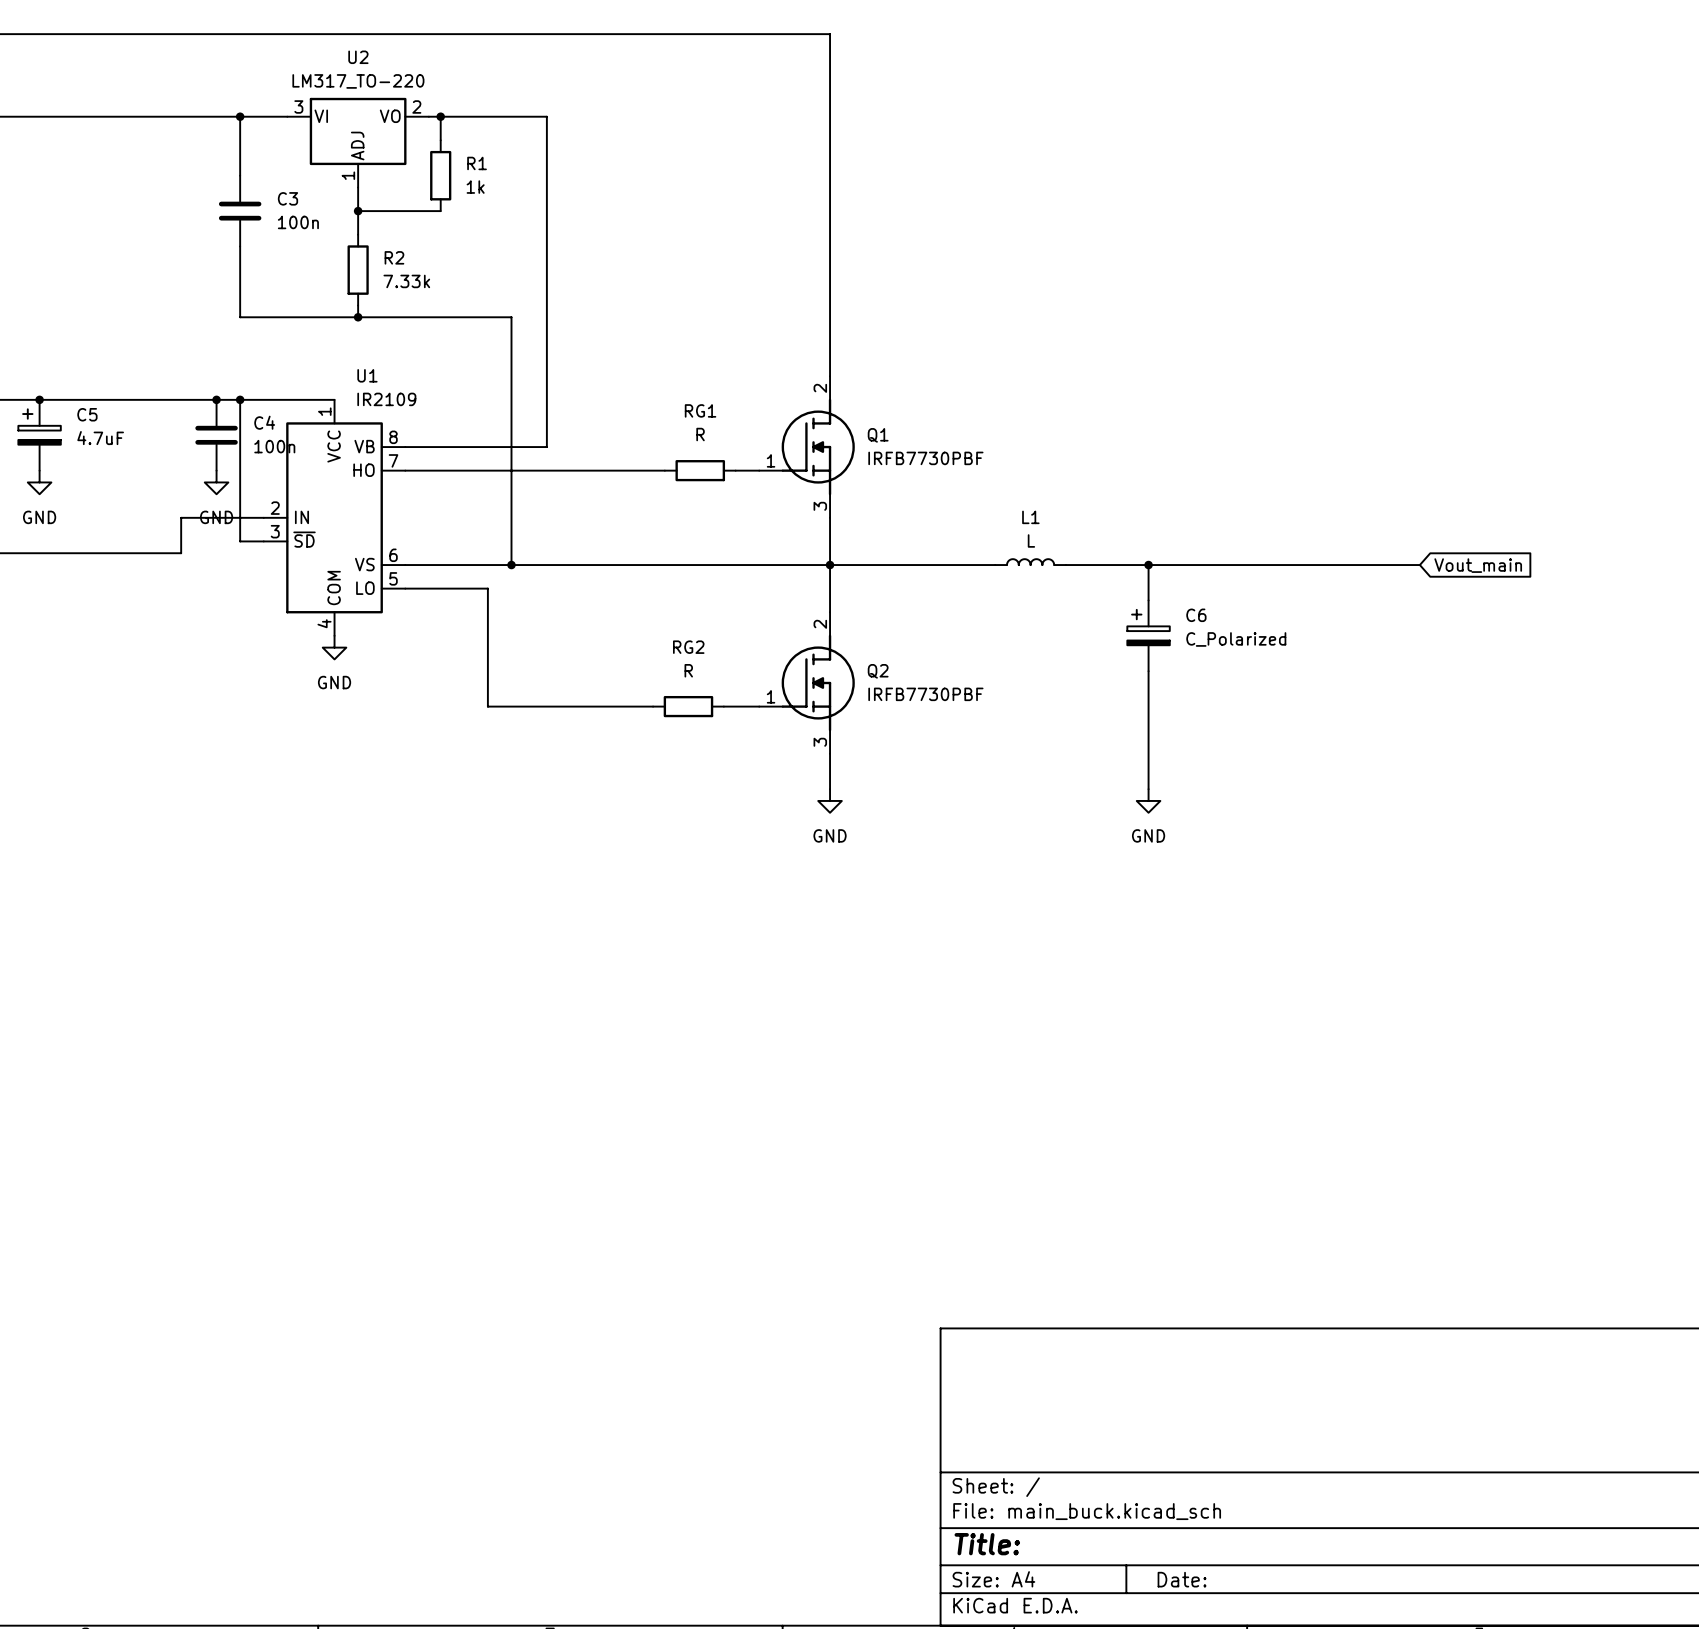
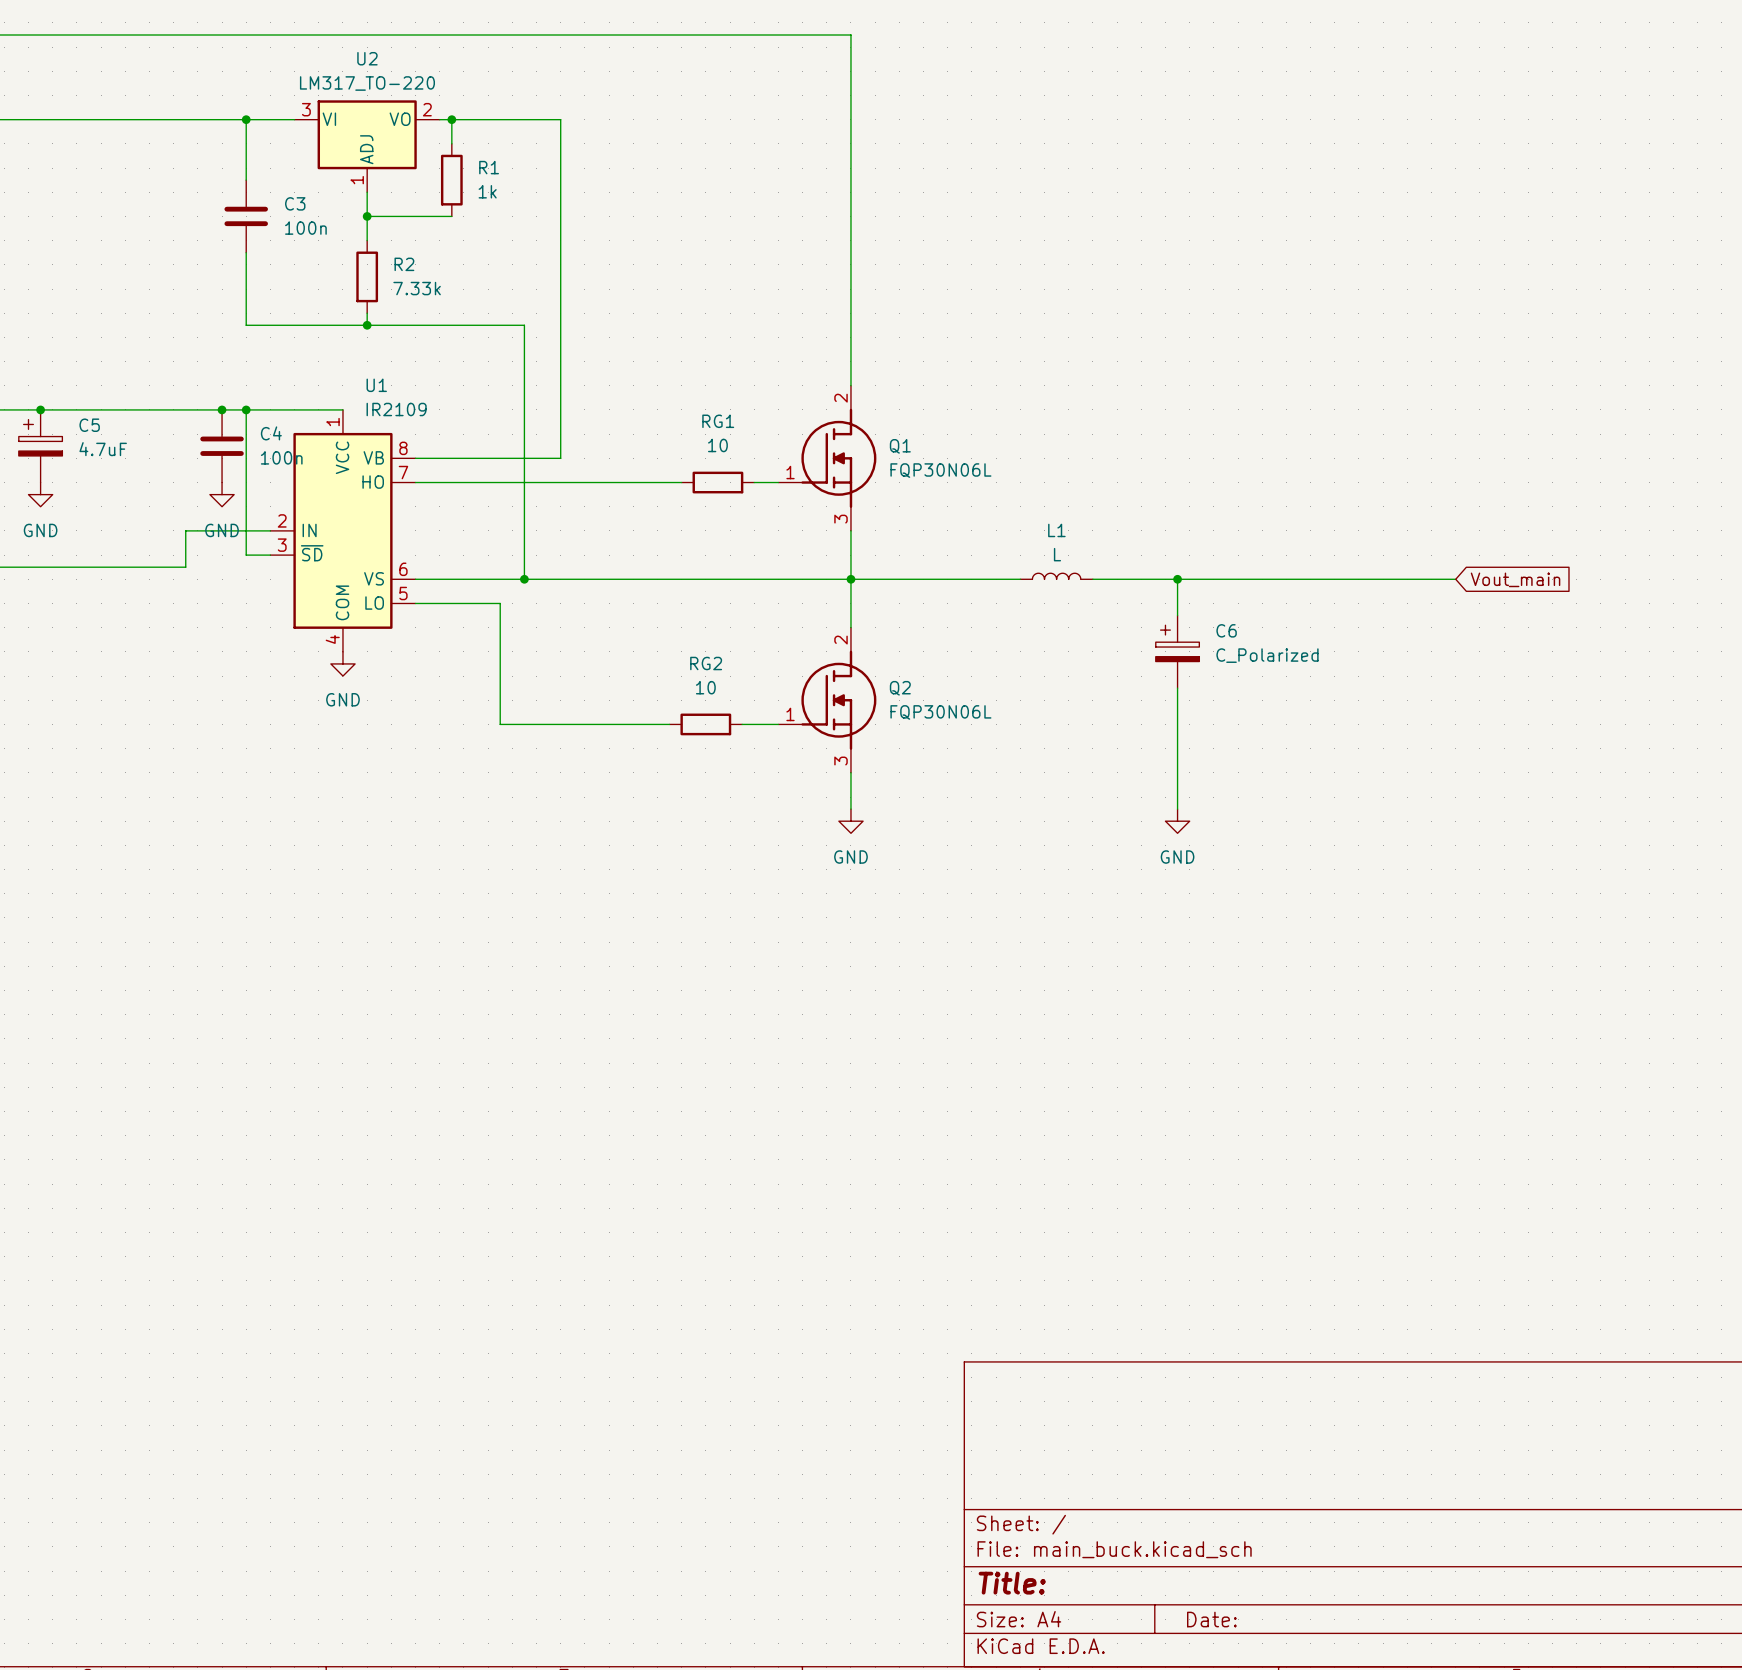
RG1 value: R (700, 434) -> 10 (717, 445)
Q1 value: IRFB7730PBF (925, 458) -> FQP30N06L (940, 470)
RG2 value: R (688, 670) -> 10 (705, 687)
Q2 value: IRFB7730PBF (925, 694) -> FQP30N06L (940, 712)

